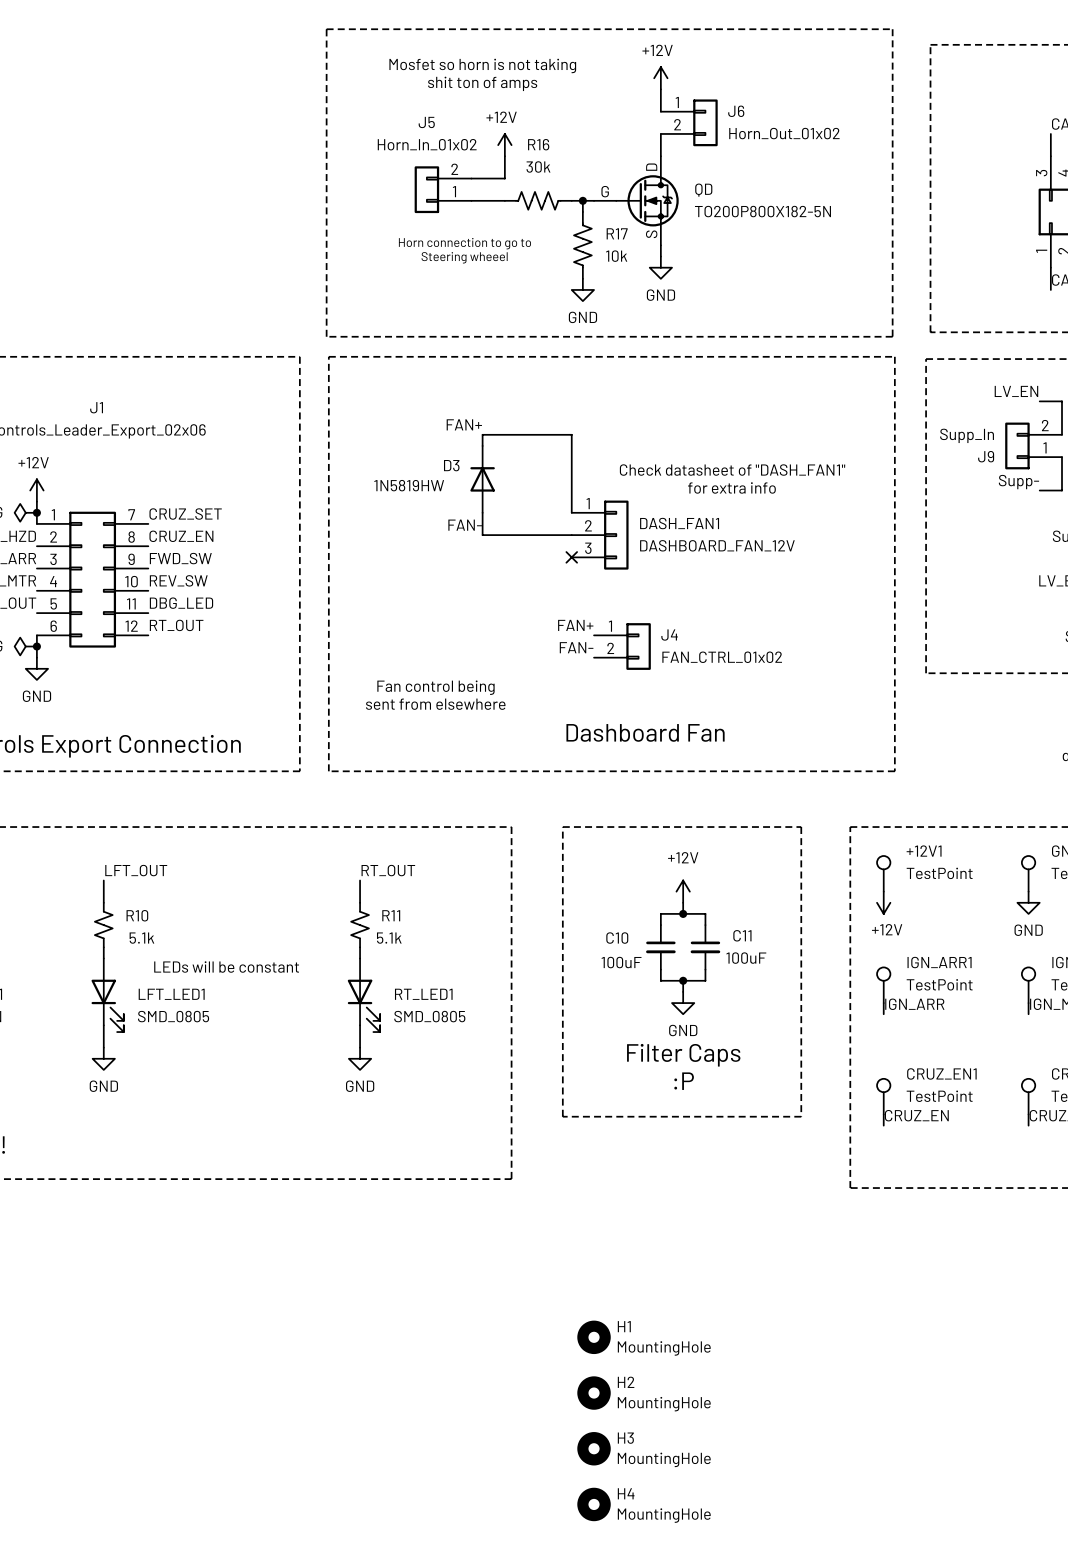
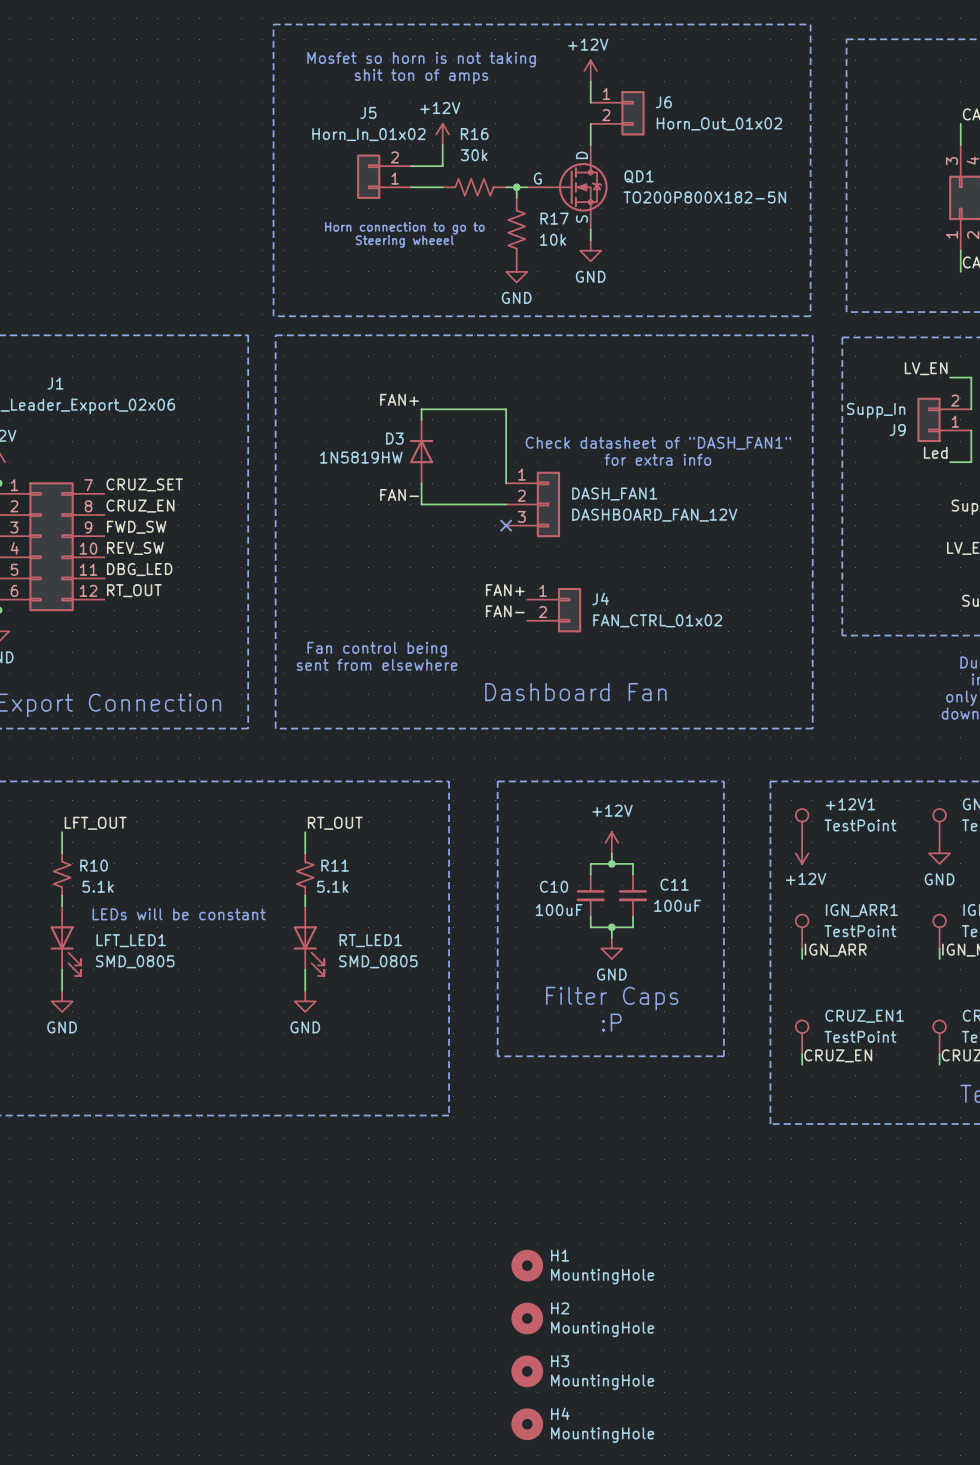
QD name: QD (703, 190) -> QD1 (639, 176)
label: Supp- (1018, 482) -> Led (935, 452)

